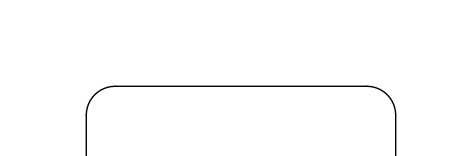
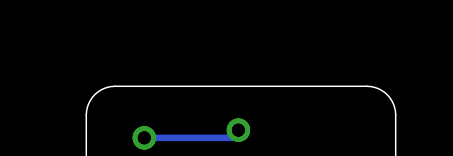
track: none -> (238, 130) (230, 137) (144, 137)
via: none -> (238, 130)
via: none -> (144, 137)

